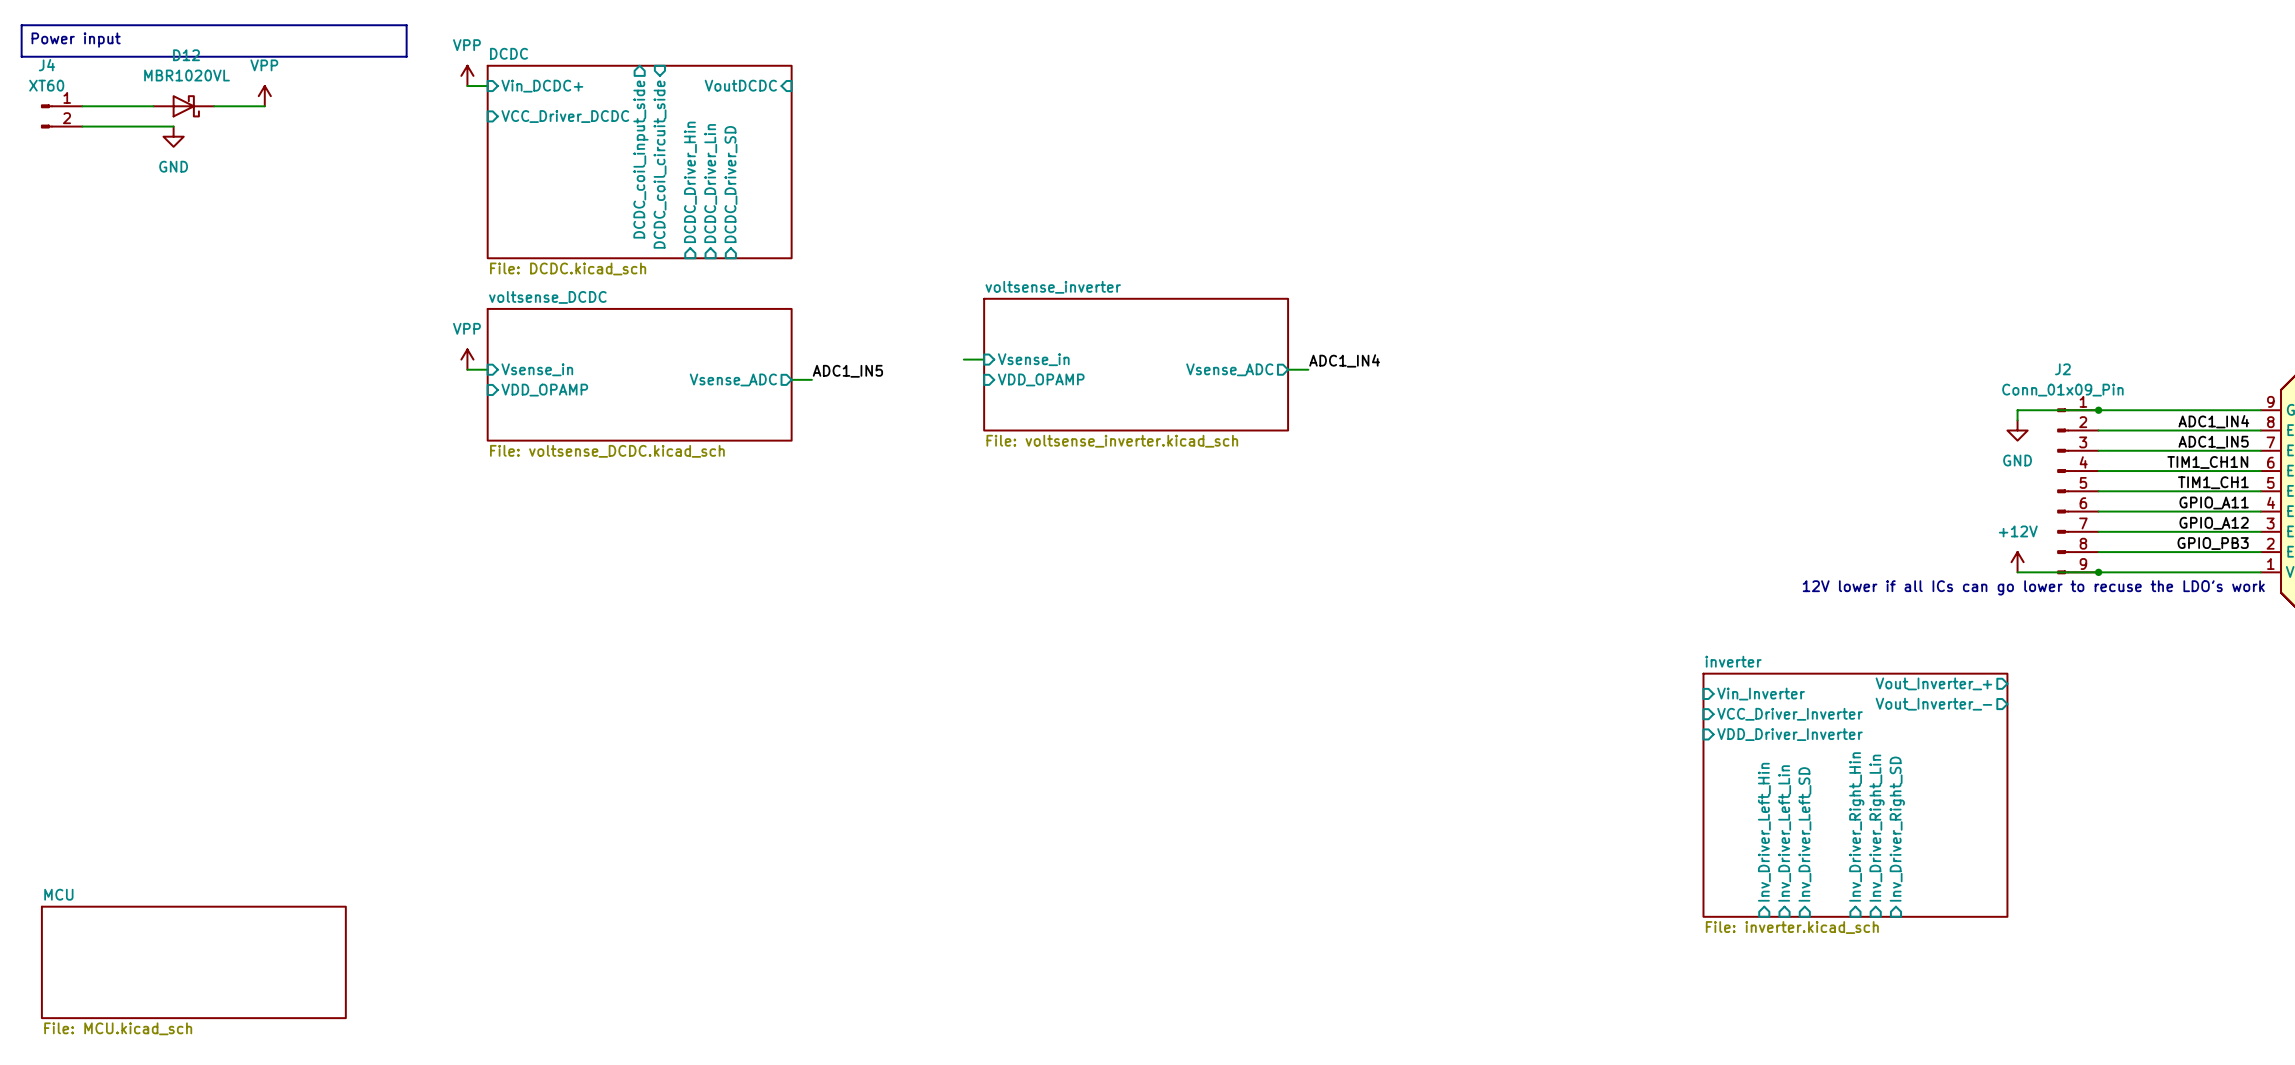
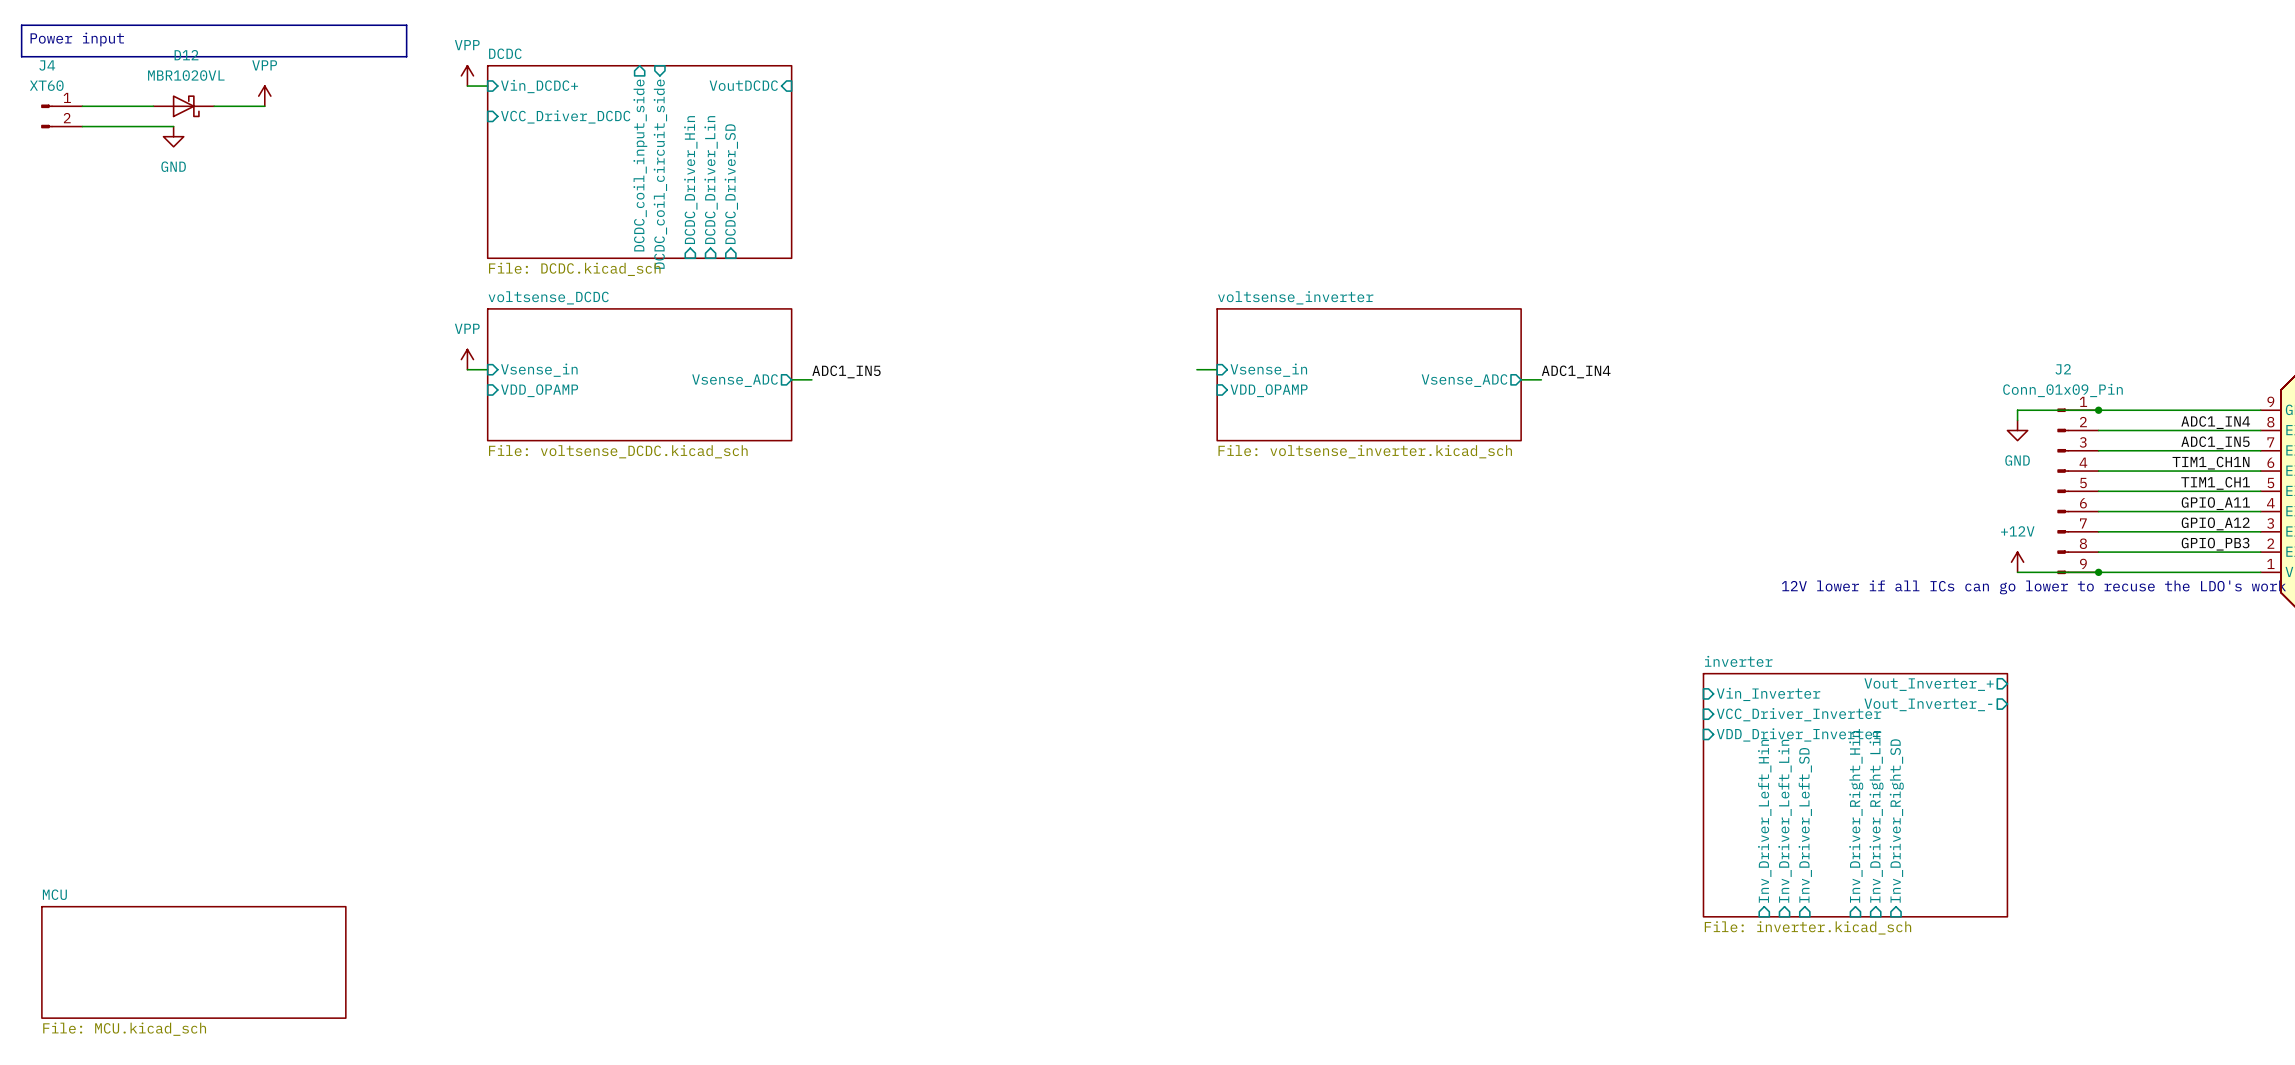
wire: (963, 359) (984, 359) -> none
sheet pin: Vsense_in (1033, 359) -> none
label: ADC1_IN4 (1344, 360) -> none
sheet voltsense_inverter: File: voltsense_inverter.kicad_sch (1136, 364) -> none
sheet pin shape: output (1229, 369) -> input (1268, 370)
sheet pin: Vsense_ADC (1229, 369) -> Vsense_in (1268, 370)
wire: (1288, 369) (1308, 369) -> (1196, 369) (1217, 369)
label: none -> ADC1_IN4 (1576, 371)
sheet voltsense_inverter: none -> File: voltsense_inverter.kicad_sch (1369, 374)
sheet pin: VDD_OPAMP (1041, 379) -> none
sheet pin: none -> Vsense_ADC (1464, 380)
wire: none -> (1521, 379) (1541, 379)
sheet pin: none -> VDD_OPAMP (1269, 390)

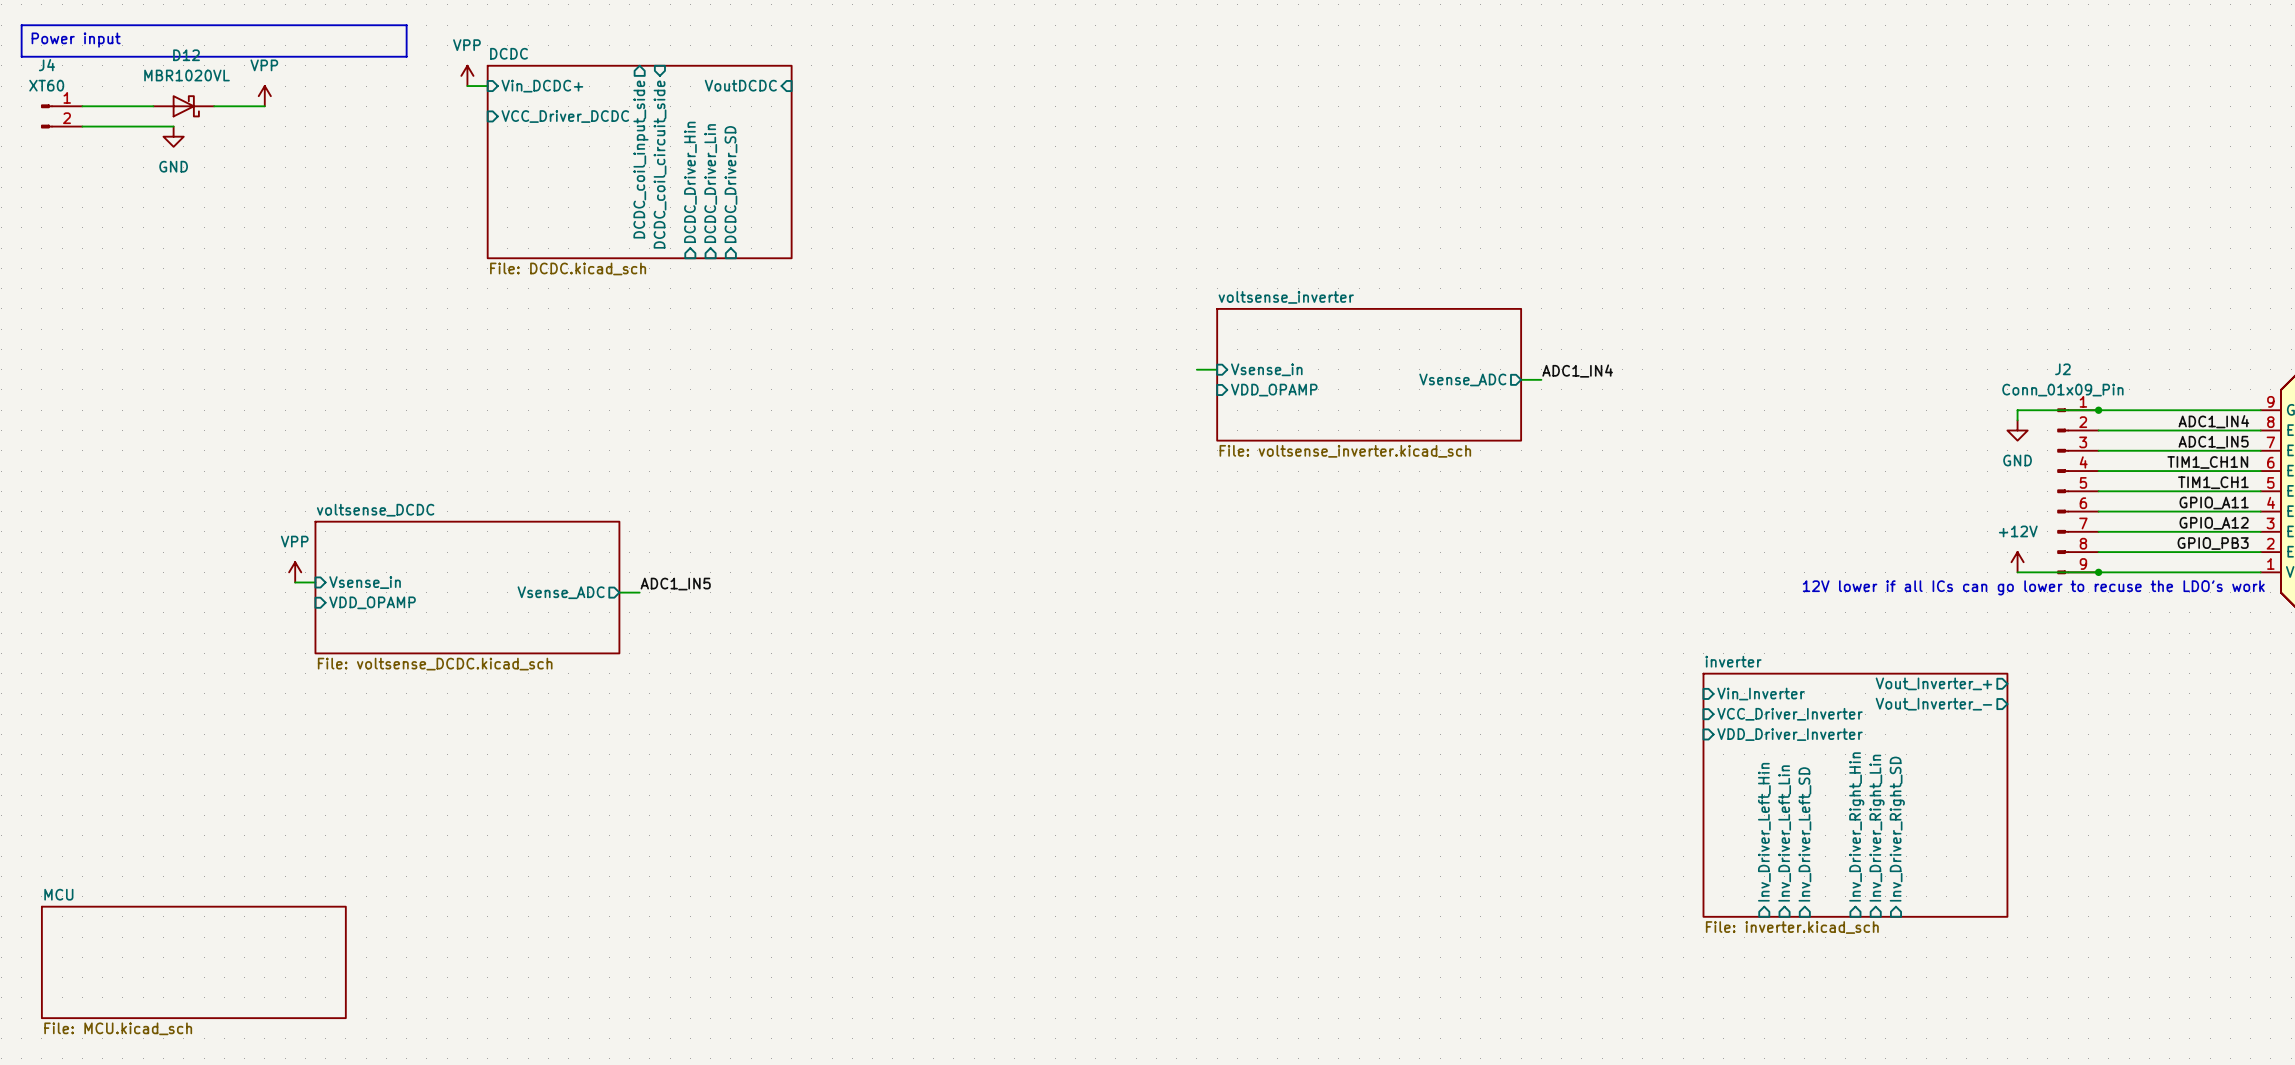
power symbol: VPP (467, 359) -> none
wire: (467, 369) (487, 369) -> none
sheet pin: Vsense_in (539, 370) -> none
label: ADC1_IN5 (846, 371) -> none
sheet voltsense_DCDC: File: voltsense_DCDC.kicad_sch (639, 374) -> none
wire: (791, 379) (811, 379) -> none
sheet pin: Vsense_ADC (735, 380) -> none
sheet pin: VDD_OPAMP (539, 390) -> none
power symbol: none -> VPP (295, 572)
wire: none -> (295, 582) (315, 582)
sheet pin: none -> Vsense_in (365, 582)
label: none -> ADC1_IN5 (675, 584)
sheet voltsense_DCDC: none -> File: voltsense_DCDC.kicad_sch (467, 587)
wire: none -> (619, 592) (639, 592)
sheet pin: none -> Vsense_ADC (561, 592)
sheet pin: none -> VDD_OPAMP (372, 602)

